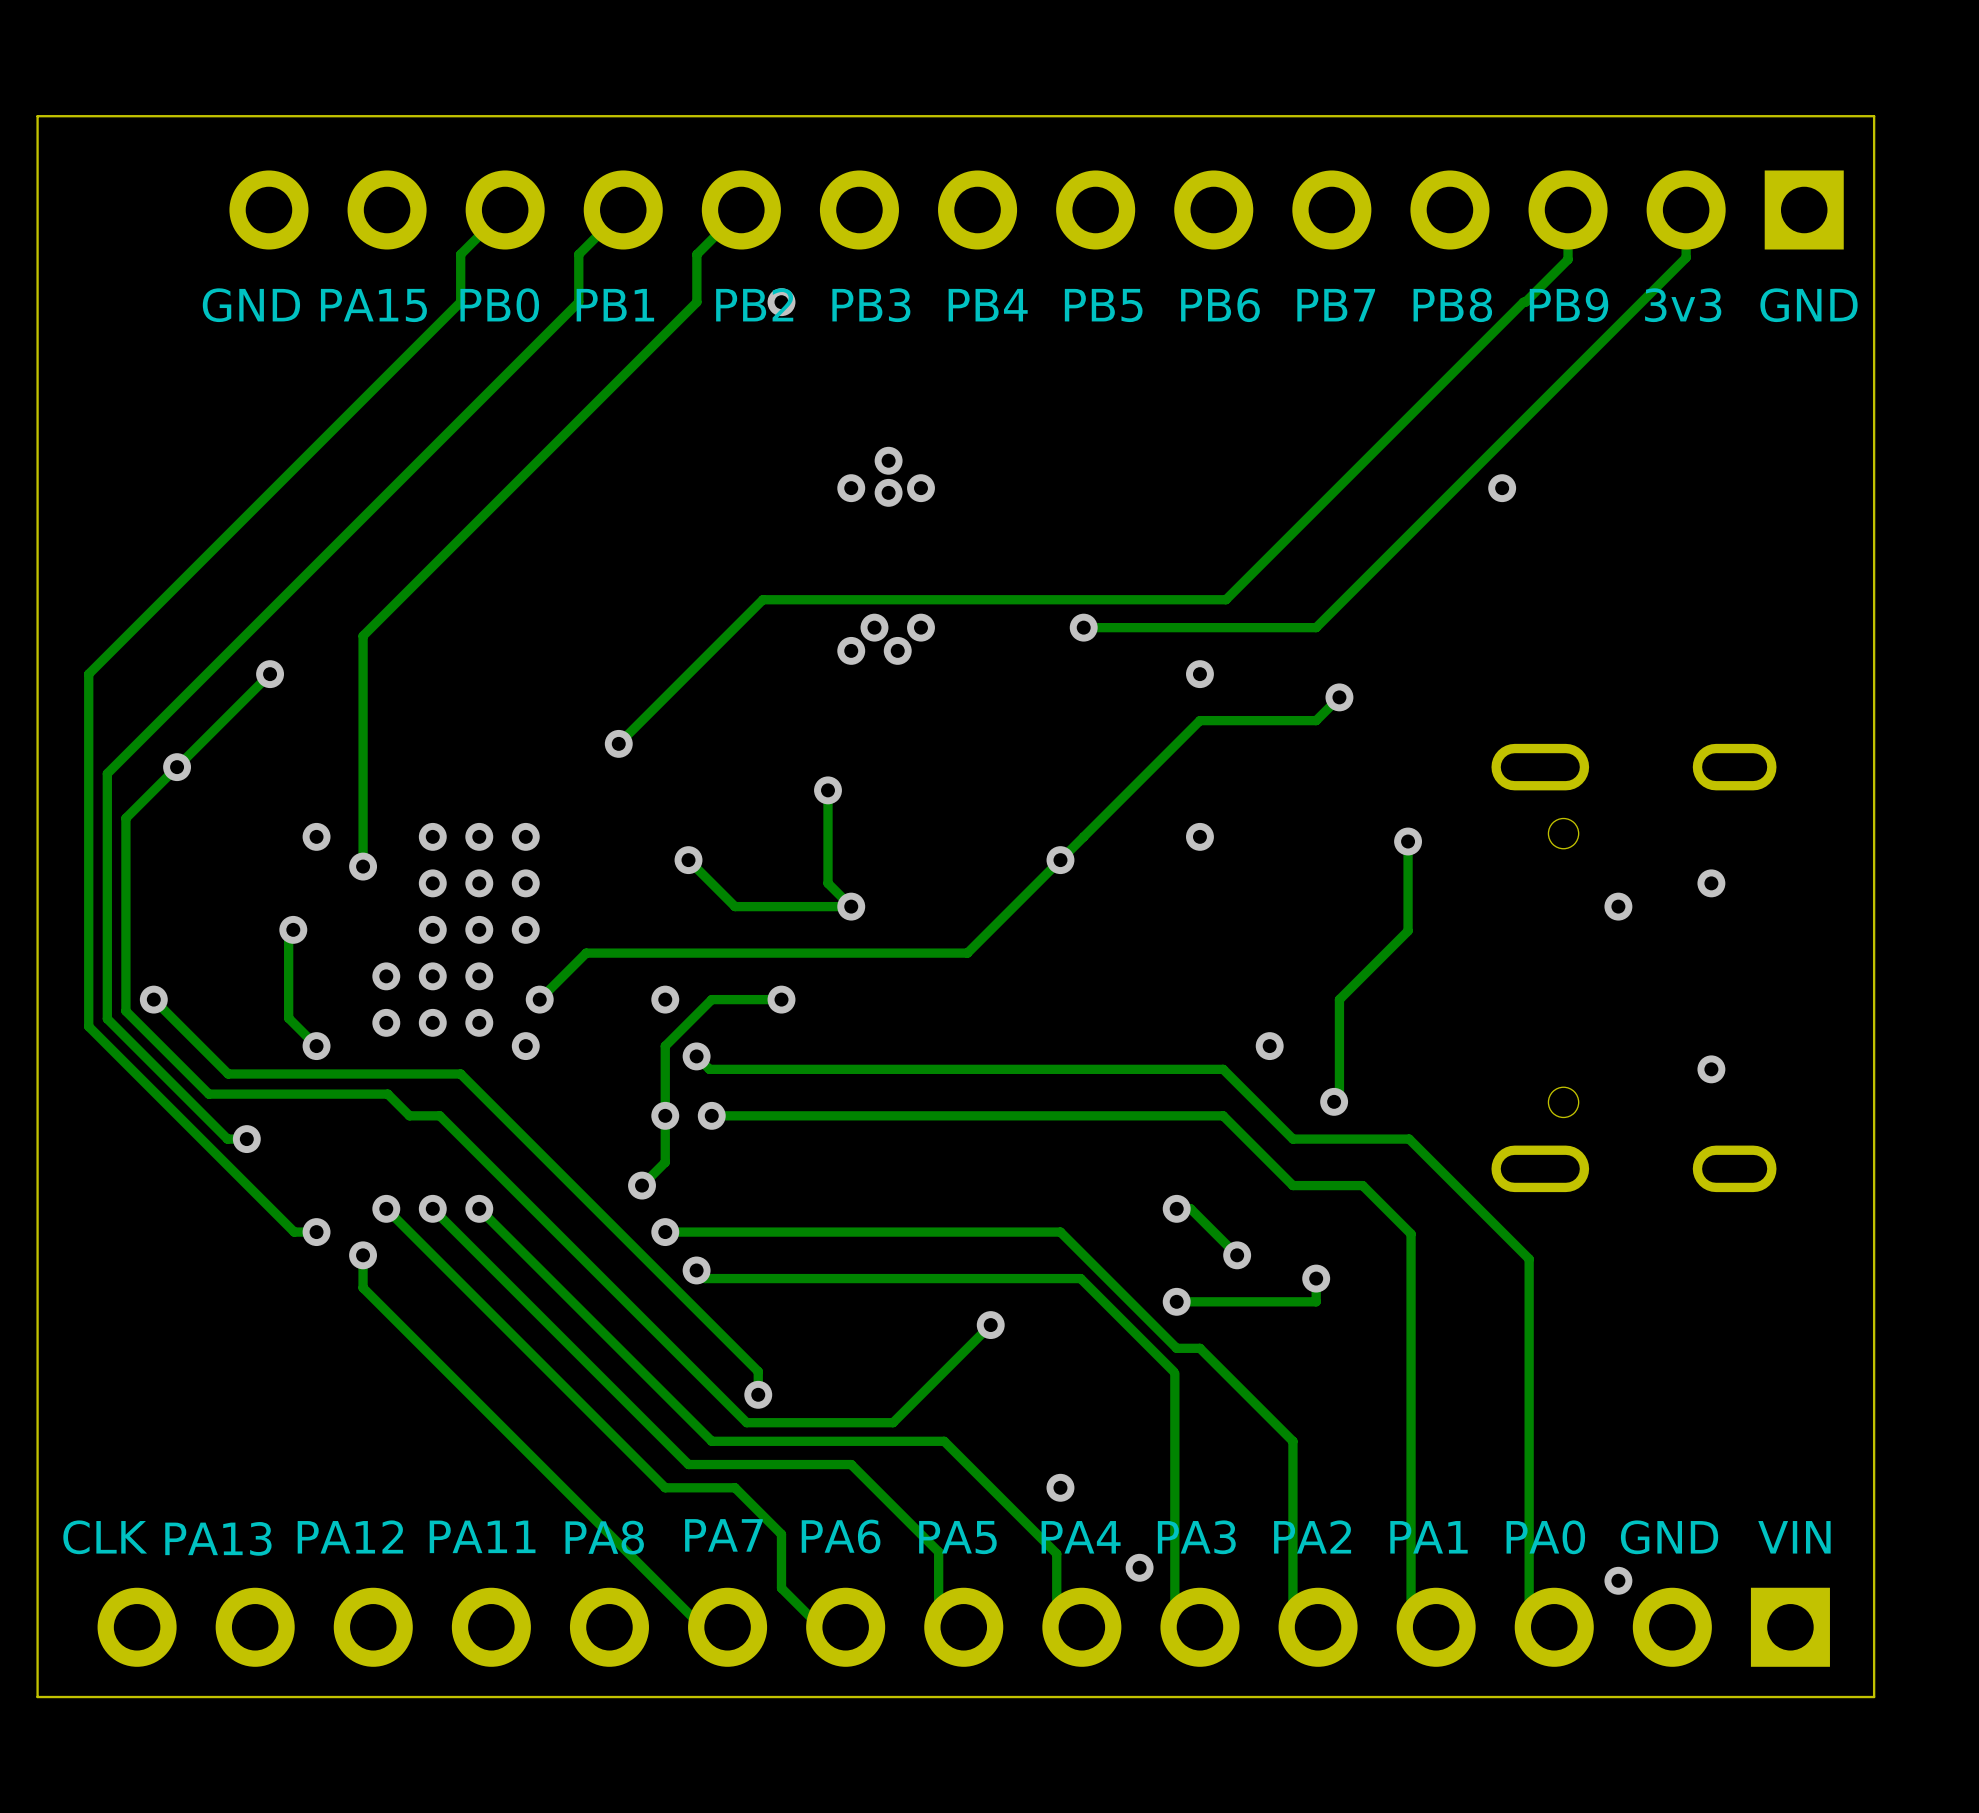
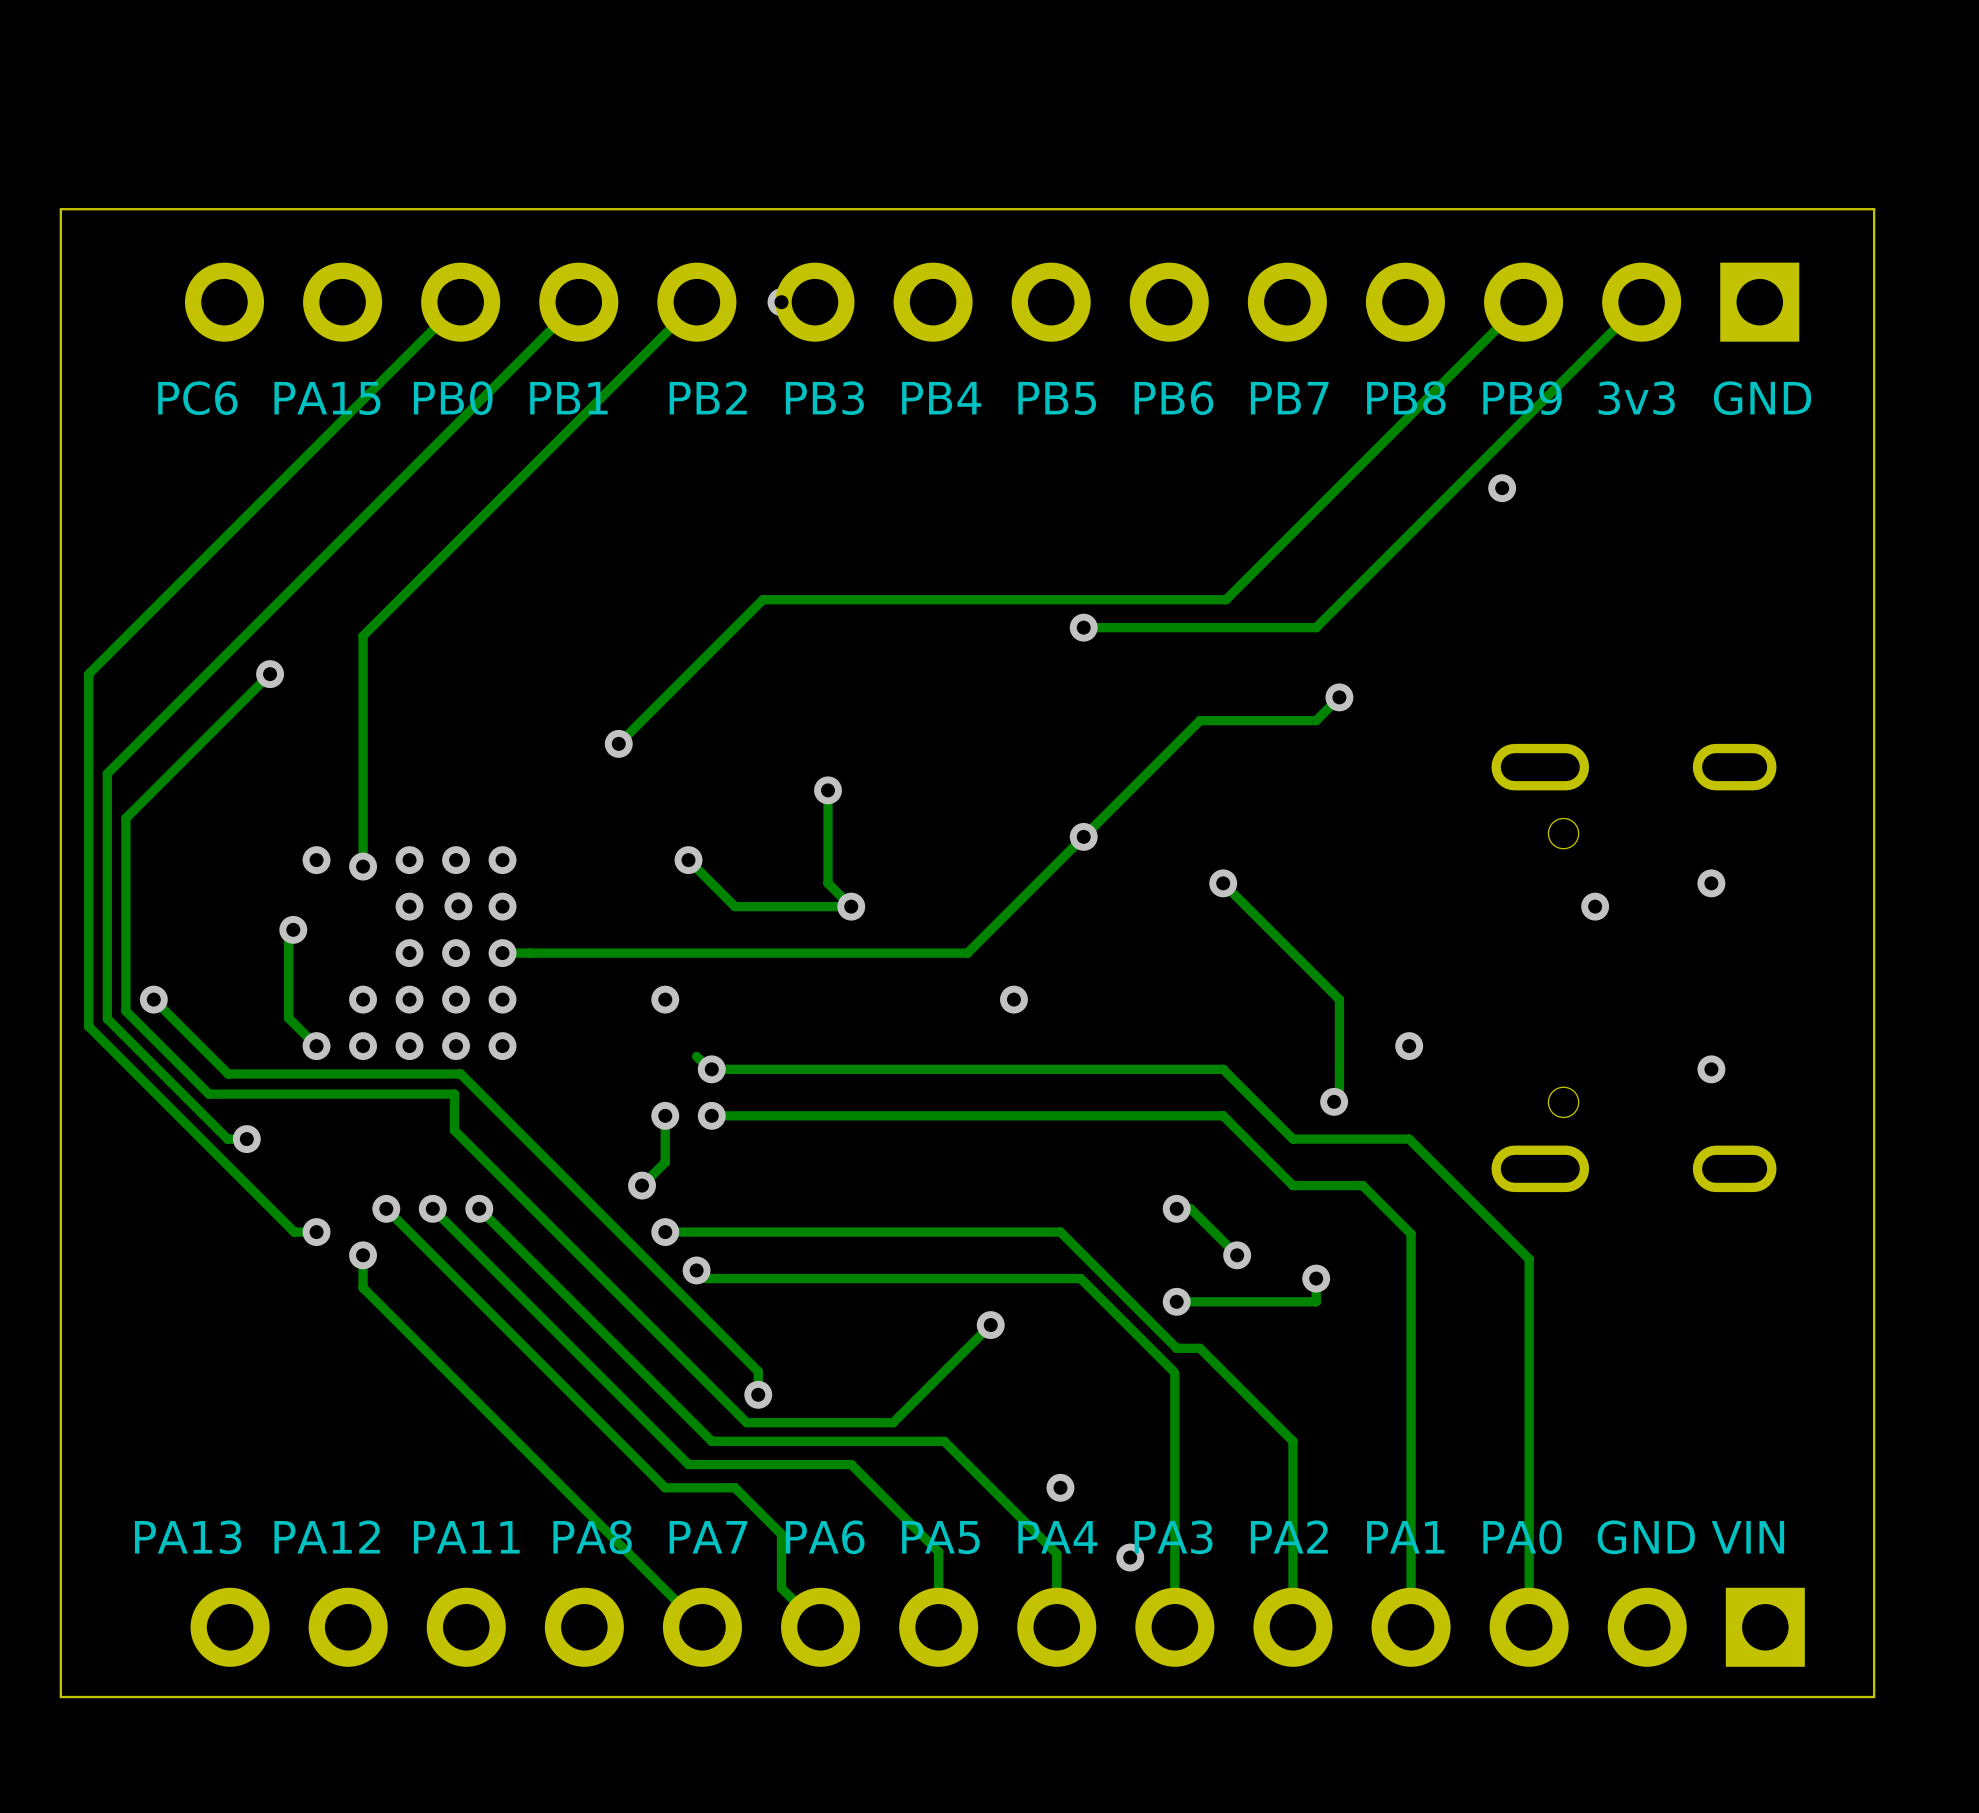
track: (505, 209) (460, 254) (460, 302) -> none
track: (623, 209) (578, 254) (578, 302) -> none
track: (741, 209) (696, 254) (696, 302) -> none
track: (1568, 209) (1568, 259) (1523, 302) -> none
track: (1686, 209) (1686, 257) (1641, 302) -> none
board edge: (1874, 209) (1874, 116) (37, 116) (37, 1697) (60, 1697) -> (1874, 209) (60, 209) (60, 1697)
part position: (1036, 210) -> (992, 302)
text position: PB2 (754, 304) -> PB2 (708, 397)
text: GND (251, 305) -> none
text position: PA15 (373, 305) -> PA15 (327, 398)
text position: PB0 (499, 305) -> PB0 (453, 398)
text position: PB1 (615, 305) -> PB1 (568, 398)
text position: PB3 (871, 305) -> PB3 (824, 398)
text position: PB4 (988, 305) -> PB4 (941, 398)
text position: PB5 (1103, 305) -> PB5 (1057, 398)
text position: PB6 (1220, 305) -> PB6 (1173, 398)
text position: PB7 (1336, 305) -> PB7 (1289, 398)
text position: PB8 (1452, 305) -> PB8 (1406, 398)
text position: PB9 (1569, 305) -> PB9 (1522, 398)
text position: 3v3 (1683, 305) -> 3v3 (1636, 398)
text position: GND (1809, 305) -> GND (1762, 398)
text: none -> PC6 (197, 398)
via: (888, 460) -> none
via: (851, 488) -> none
via: (920, 488) -> none
via: (888, 492) -> none
via: (874, 627) -> none
via: (920, 627) -> none
via: (851, 650) -> none
via: (897, 650) -> none
via: (1199, 674) -> none
via: (177, 767) -> none
via position: (316, 836) -> (316, 860)
via: (432, 836) -> none
via: (479, 836) -> none
via: (525, 836) -> none
via position: (1199, 836) -> (1223, 883)
track: (1408, 841) (1408, 930) (1339, 999) -> (1223, 883) (1339, 999)
via: (1408, 841) -> none
via: none -> (409, 860)
via: none -> (456, 860)
via: none -> (502, 860)
via position: (1060, 860) -> (1083, 836)
via: (432, 883) -> none
via: (479, 883) -> none
via: (525, 883) -> none
via: none -> (409, 906)
via: none -> (458, 906)
via: none -> (502, 906)
via position: (1618, 906) -> (1595, 906)
via: (432, 929) -> none
via: (479, 929) -> none
via: (525, 929) -> none
via: none -> (409, 953)
via: none -> (456, 953)
via: none -> (502, 953)
track: (586, 953) (539, 999) -> (586, 953) (502, 953)
via: (386, 976) -> none
via: (432, 976) -> none
via: (479, 976) -> none
via: none -> (363, 999)
via: none -> (409, 999)
via: none -> (456, 999)
via: none -> (502, 999)
via: (539, 999) -> none
track: (781, 999) (711, 999) (665, 1046) (665, 1115) -> none
via: (781, 999) -> none
via: none -> (1013, 999)
via: (386, 1022) -> none
via: (432, 1022) -> none
via: (479, 1022) -> none
via: none -> (363, 1046)
via: none -> (409, 1046)
via: none -> (456, 1046)
via: none -> (502, 1046)
via: (525, 1046) -> none
via: (1269, 1046) -> none
via: none -> (1409, 1046)
via position: (696, 1056) -> (711, 1069)
track: (387, 1094) (409, 1115) (439, 1115) (454, 1130) -> (387, 1094) (454, 1094) (454, 1130)
text position: PA7 (723, 1535) -> PA7 (708, 1537)
text position: PA12 (350, 1536) -> PA12 (327, 1536)
text position: PA11 (482, 1536) -> PA11 (466, 1537)
text position: PA6 (841, 1536) -> PA6 (825, 1537)
text position: PA2 (1312, 1536) -> PA2 (1289, 1536)
text: CLK (105, 1537) -> none
text position: PA8 (604, 1537) -> PA8 (592, 1537)
text position: PA5 (957, 1537) -> PA5 (940, 1537)
text position: PA4 (1081, 1537) -> PA4 (1057, 1537)
text position: PA3 (1196, 1537) -> PA3 (1173, 1537)
text position: PA1 (1428, 1537) -> PA1 (1405, 1537)
text position: PA0 (1545, 1537) -> PA0 (1522, 1537)
text position: GND (1669, 1537) -> GND (1646, 1537)
text position: VIN (1794, 1537) -> VIN (1747, 1537)
text position: PA13 (218, 1538) -> PA13 (188, 1537)
via position: (1139, 1567) -> (1130, 1557)
via: (1618, 1580) -> none
part footprint: [97, 1587, 1830, 1667] -> [190, 1587, 1805, 1667]

